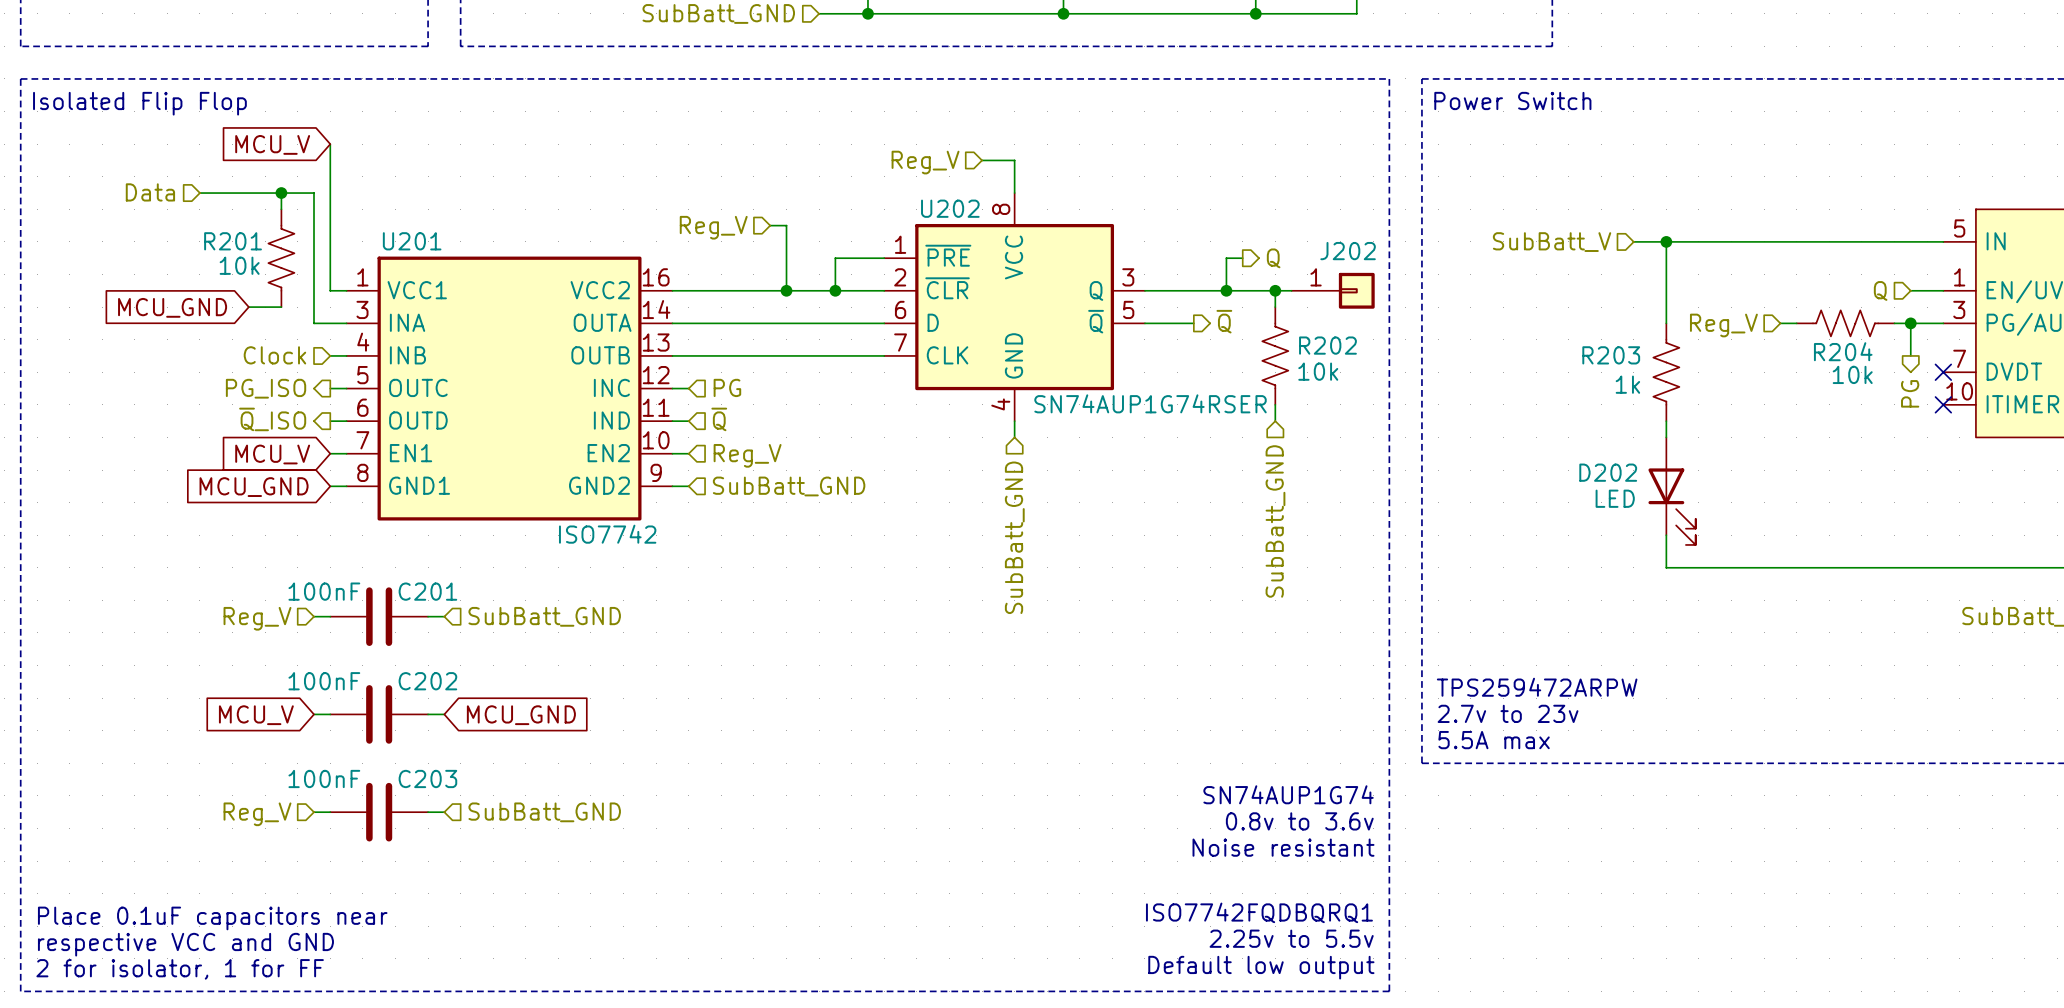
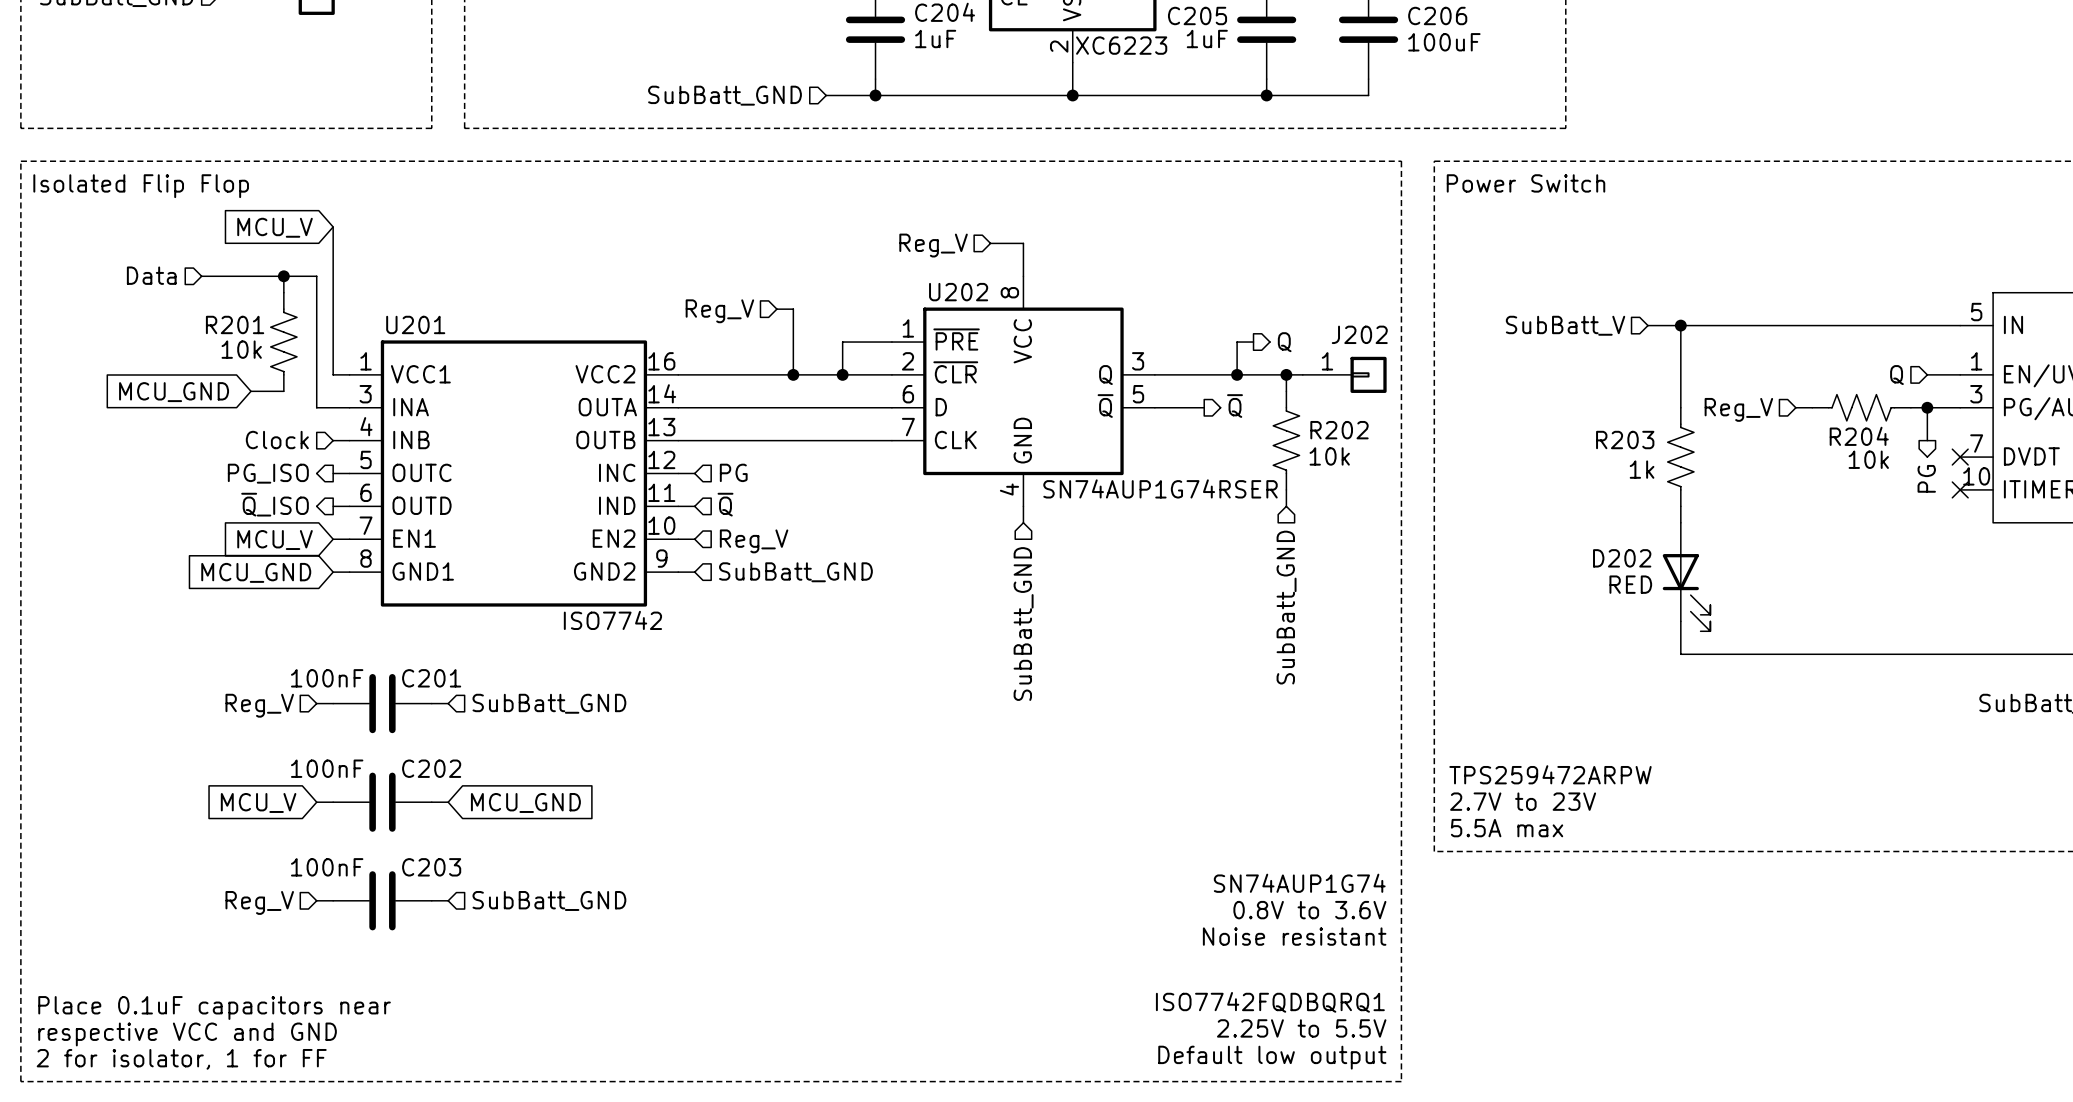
D202 value: LED (1615, 498) -> RED (1630, 584)
text: 2.7v to 23v (1508, 713) -> 2.7V to 23V (1523, 801)
text: 0.8v to 3.6v (1299, 821) -> 0.8V to 3.6V (1309, 910)
text: 2.25v to 5.5v (1291, 938) -> 2.25V to 5.5V (1301, 1028)

